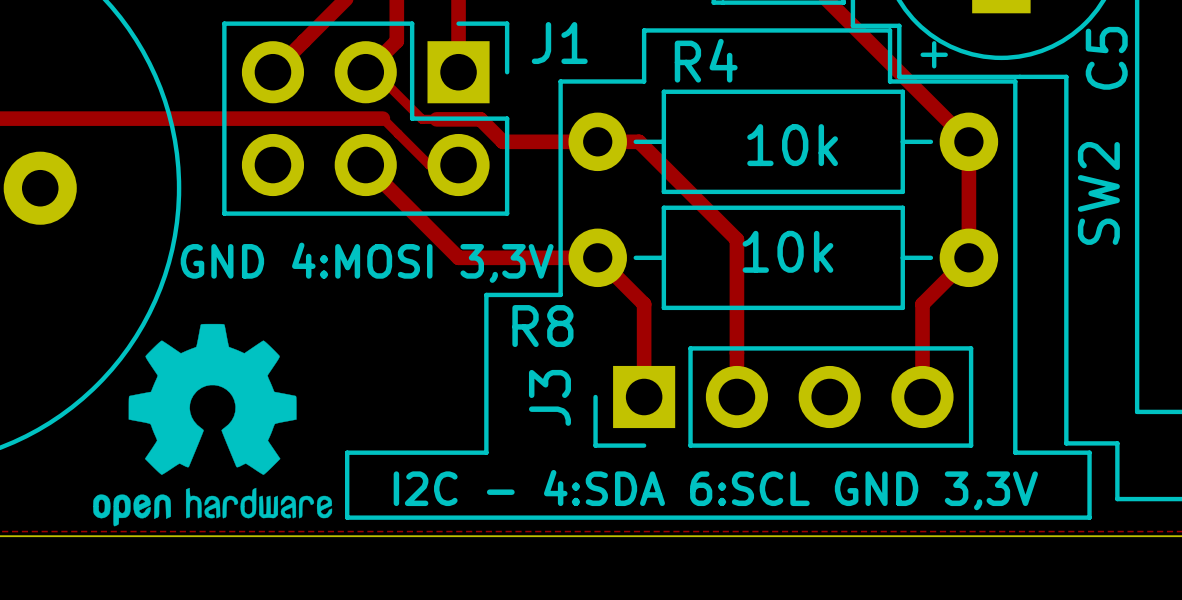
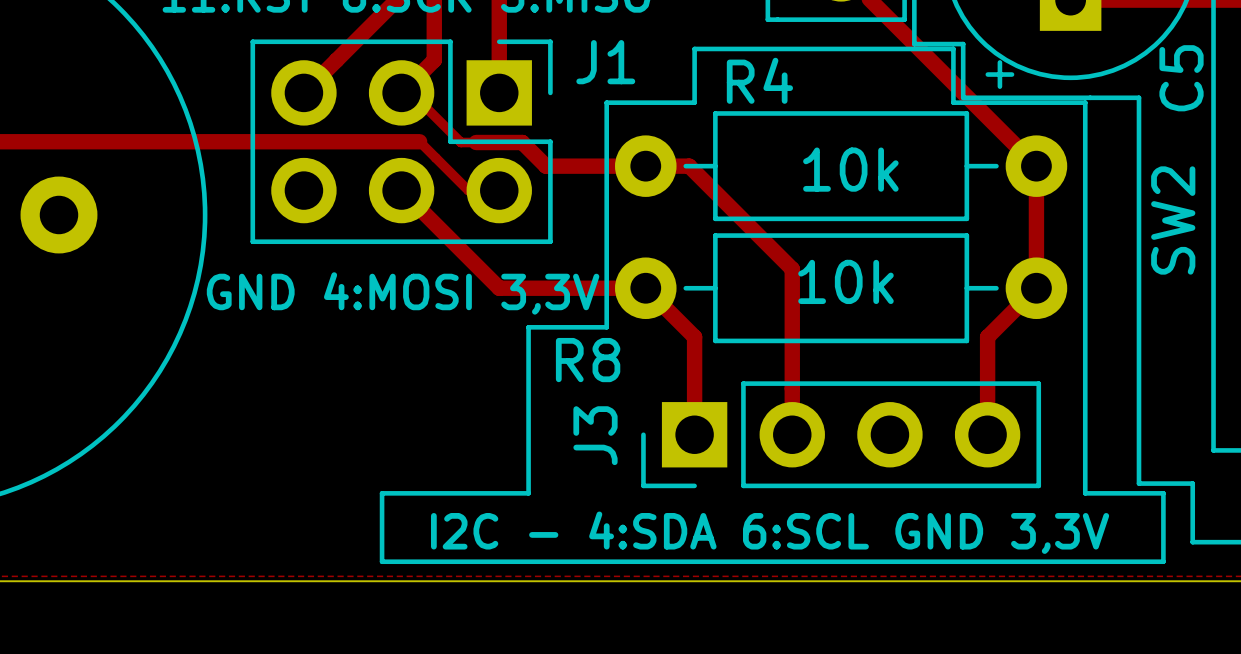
drawing: [93, 323, 333, 527] -> none

